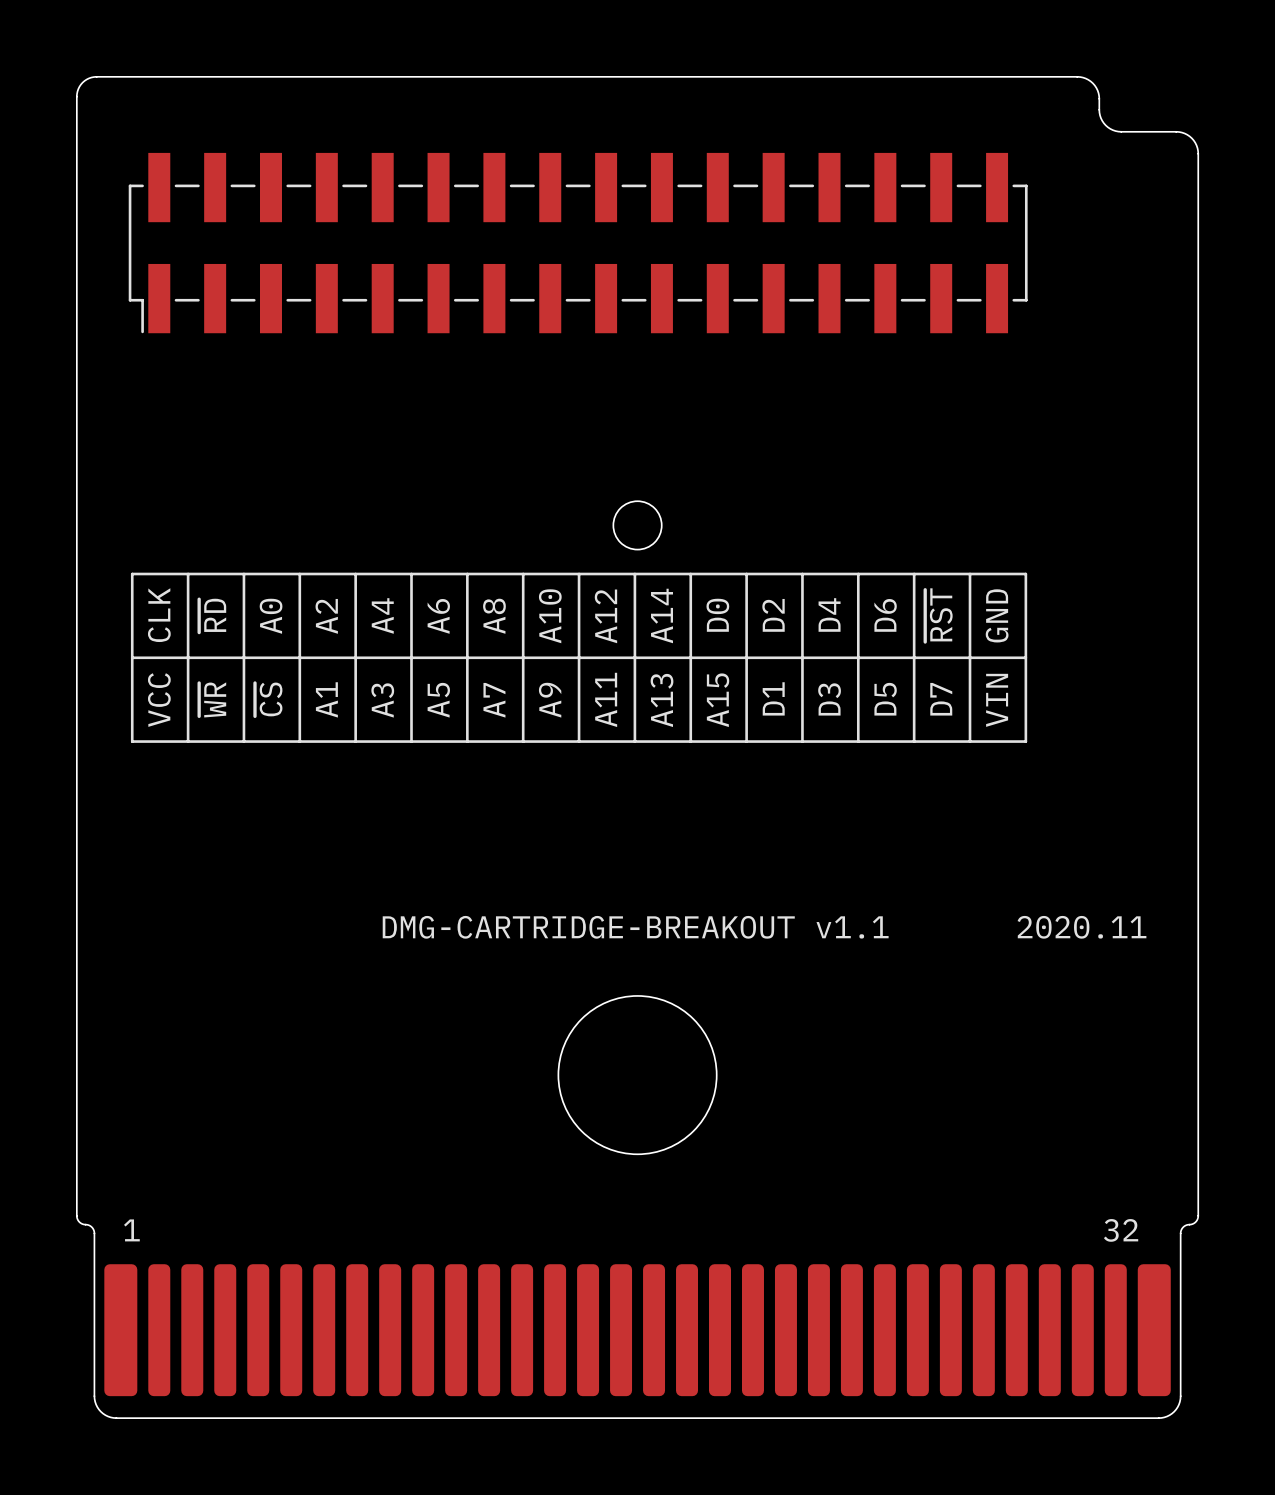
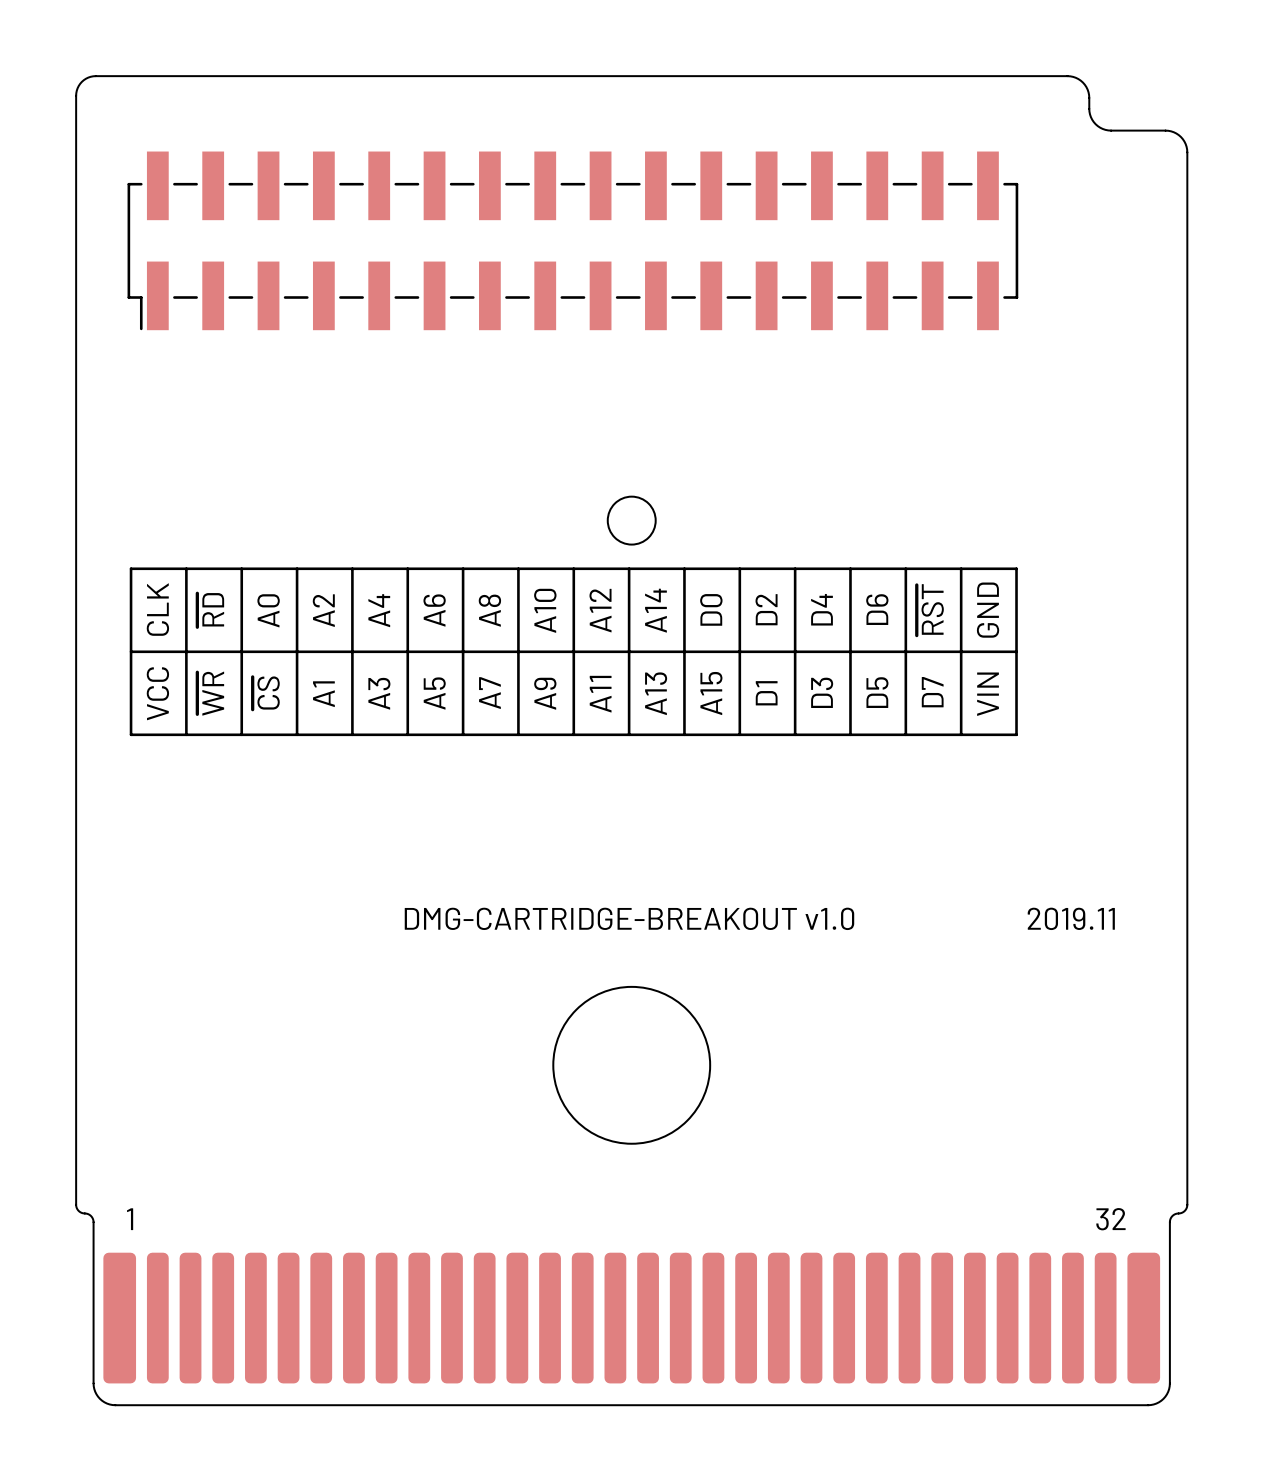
text: DMG-CARTRIDGE-BREAKOUT v1.1 (635, 927) -> DMG-CARTRIDGE-BREAKOUT v1.0 (629, 918)
text: 2020.11 (1081, 927) -> 2019.11 (1071, 918)

